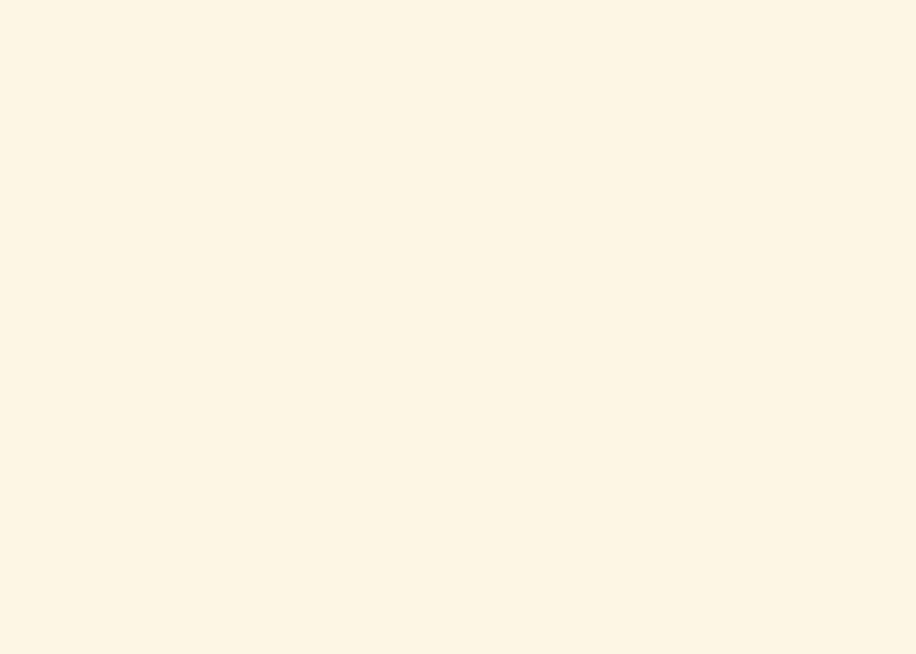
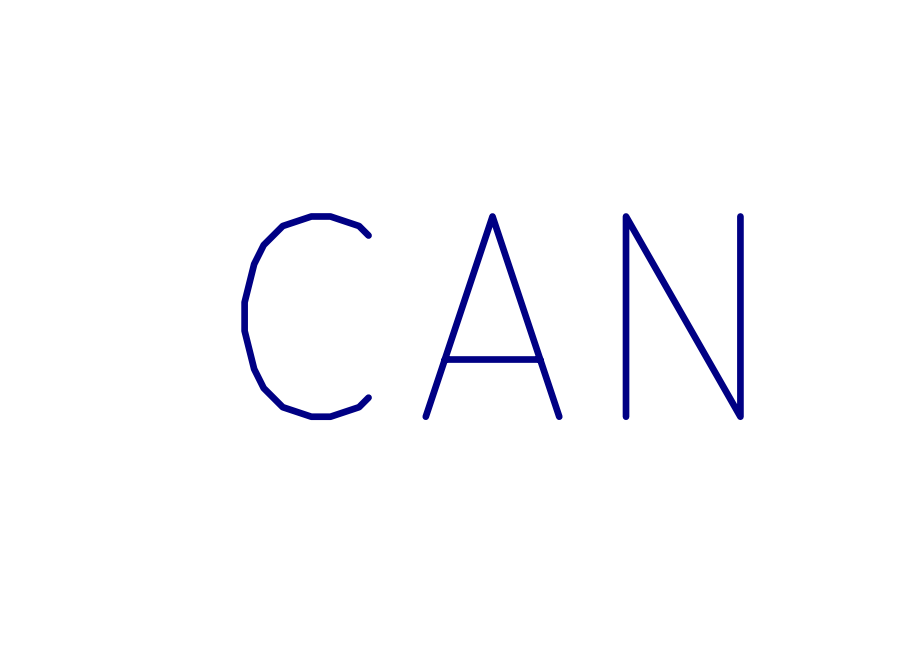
text: none -> CAN (492, 316)

